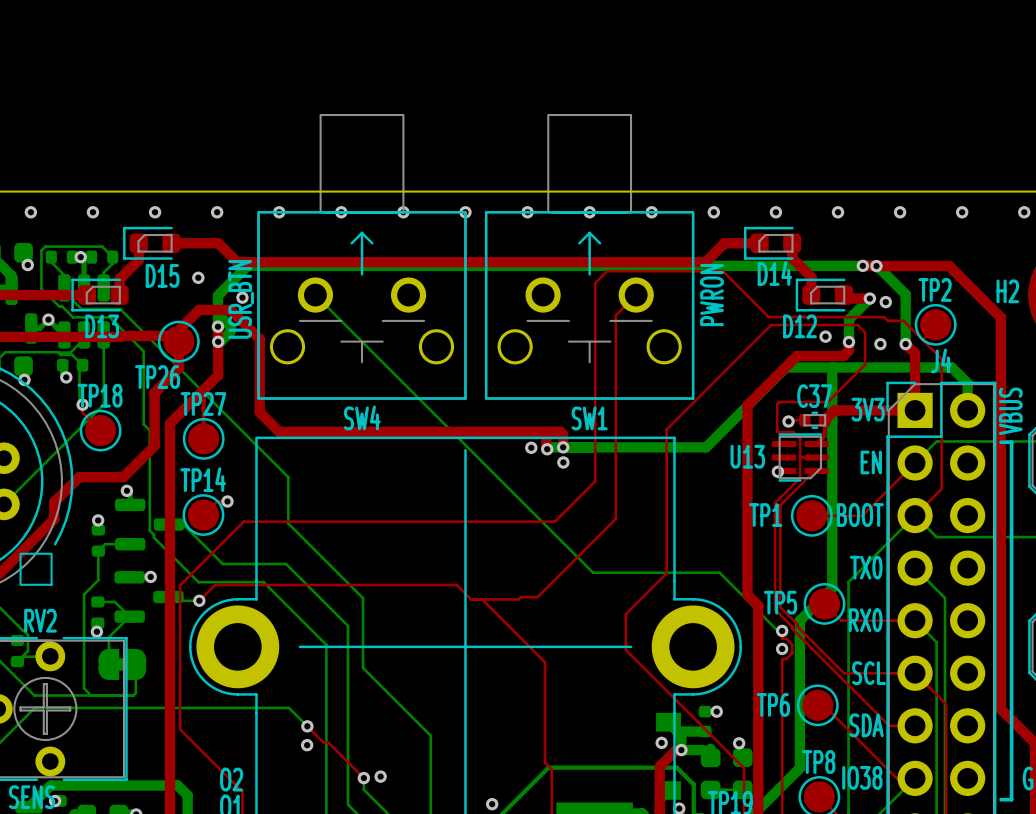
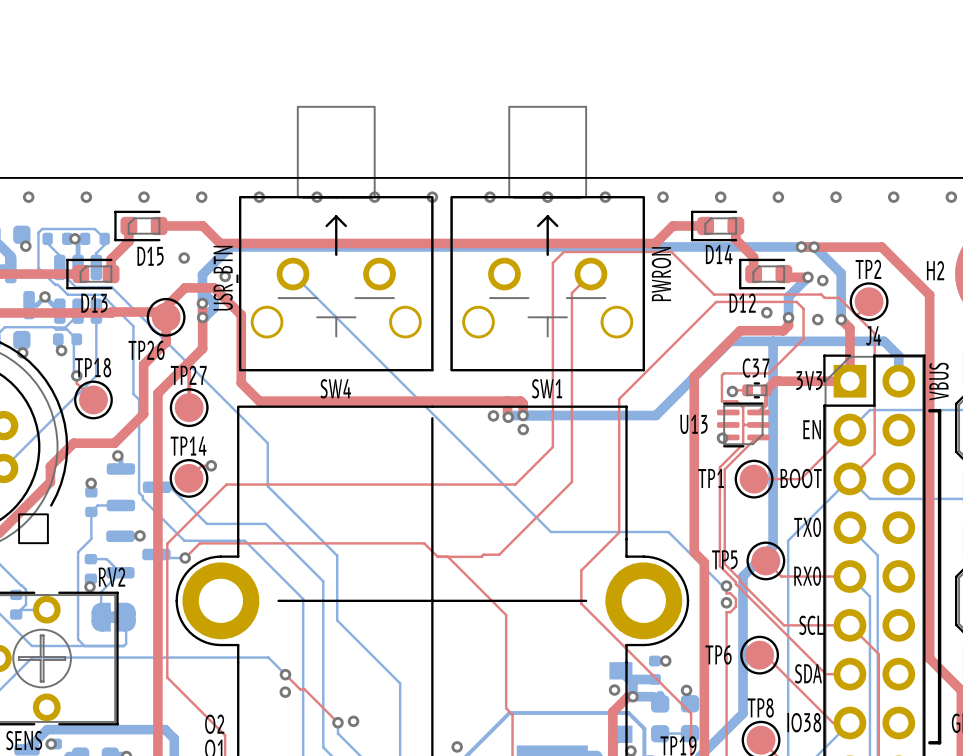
RV2 name position: RV2 (40, 620) -> RV2 (111, 577)

